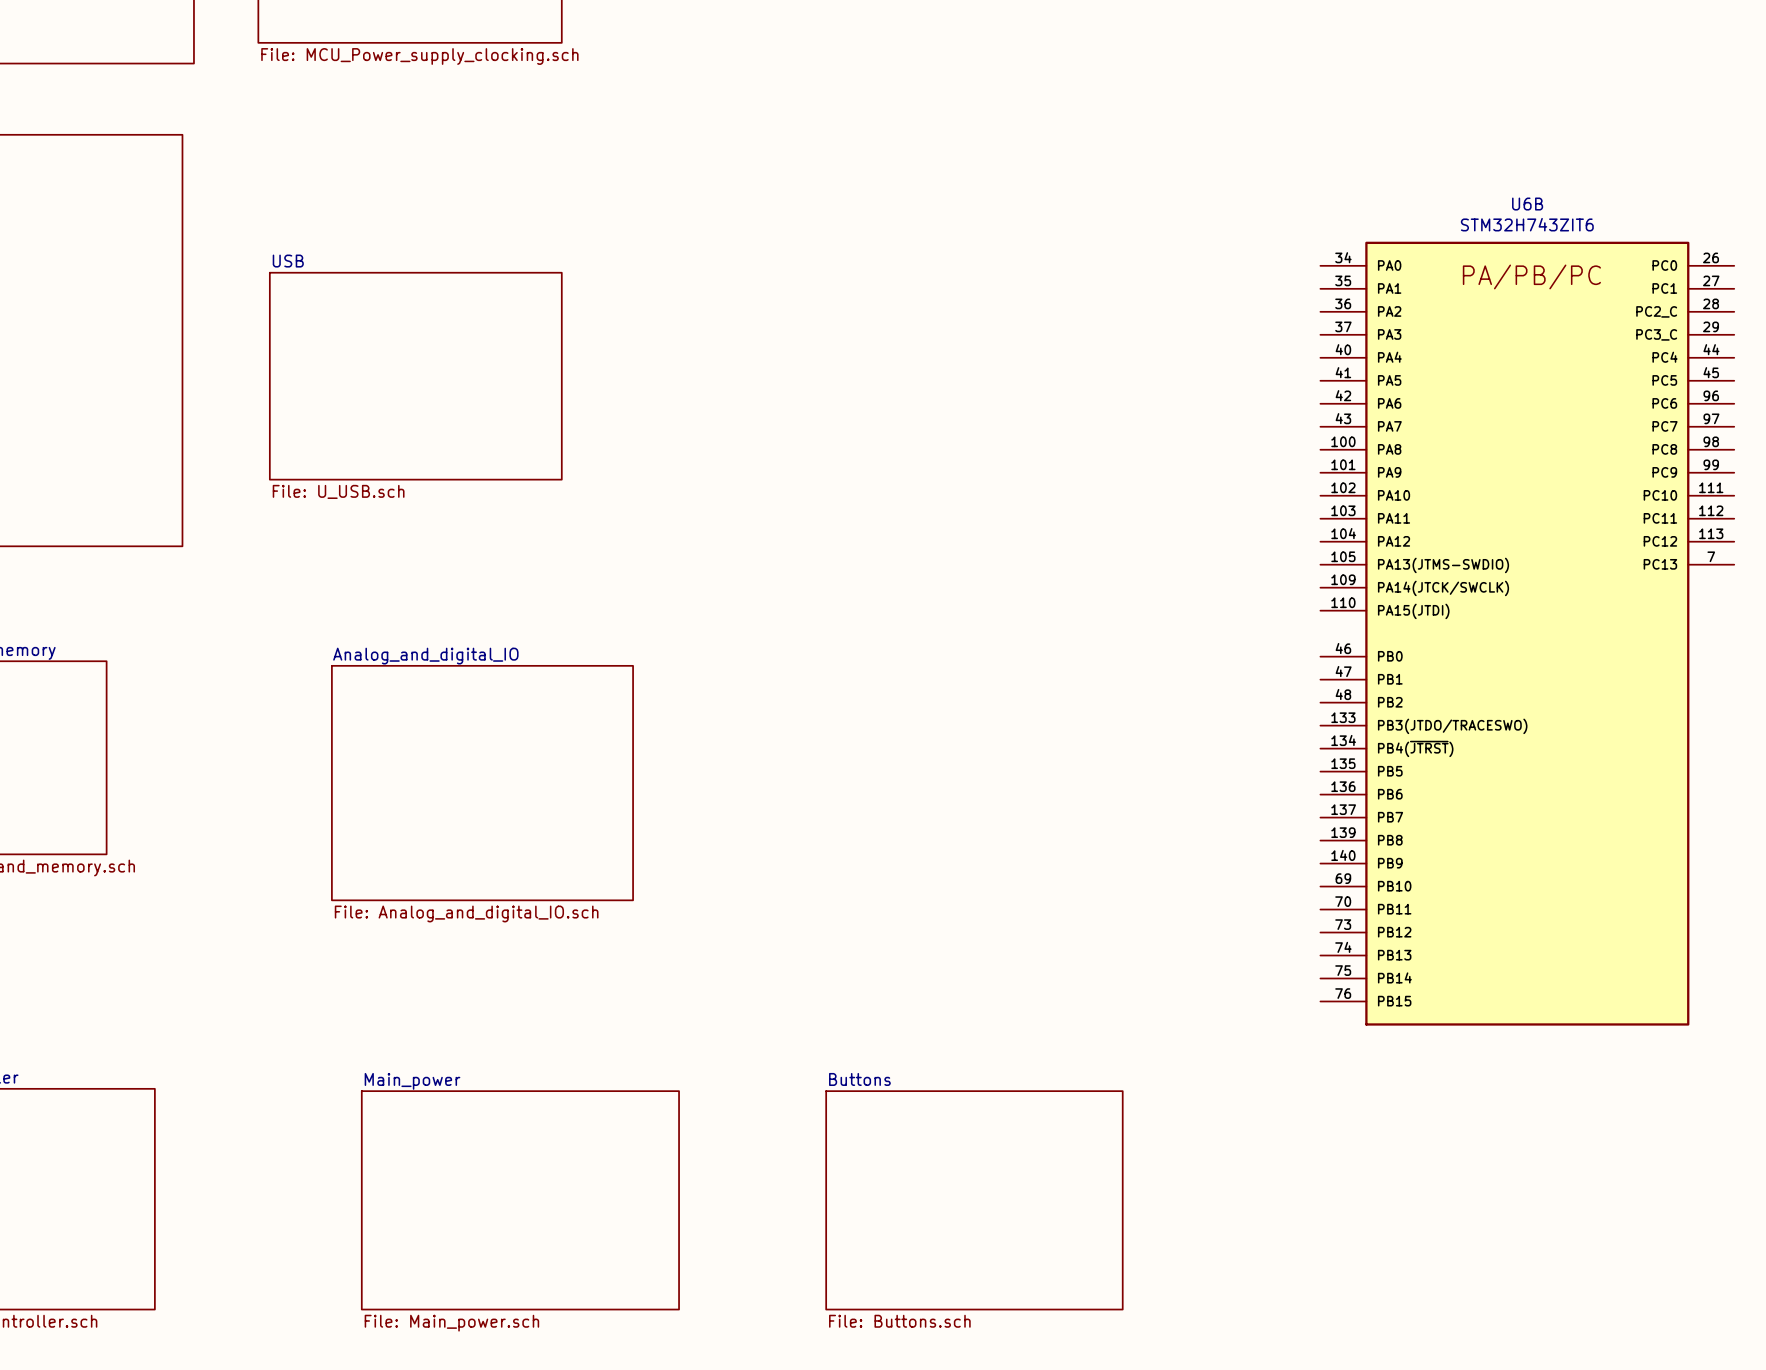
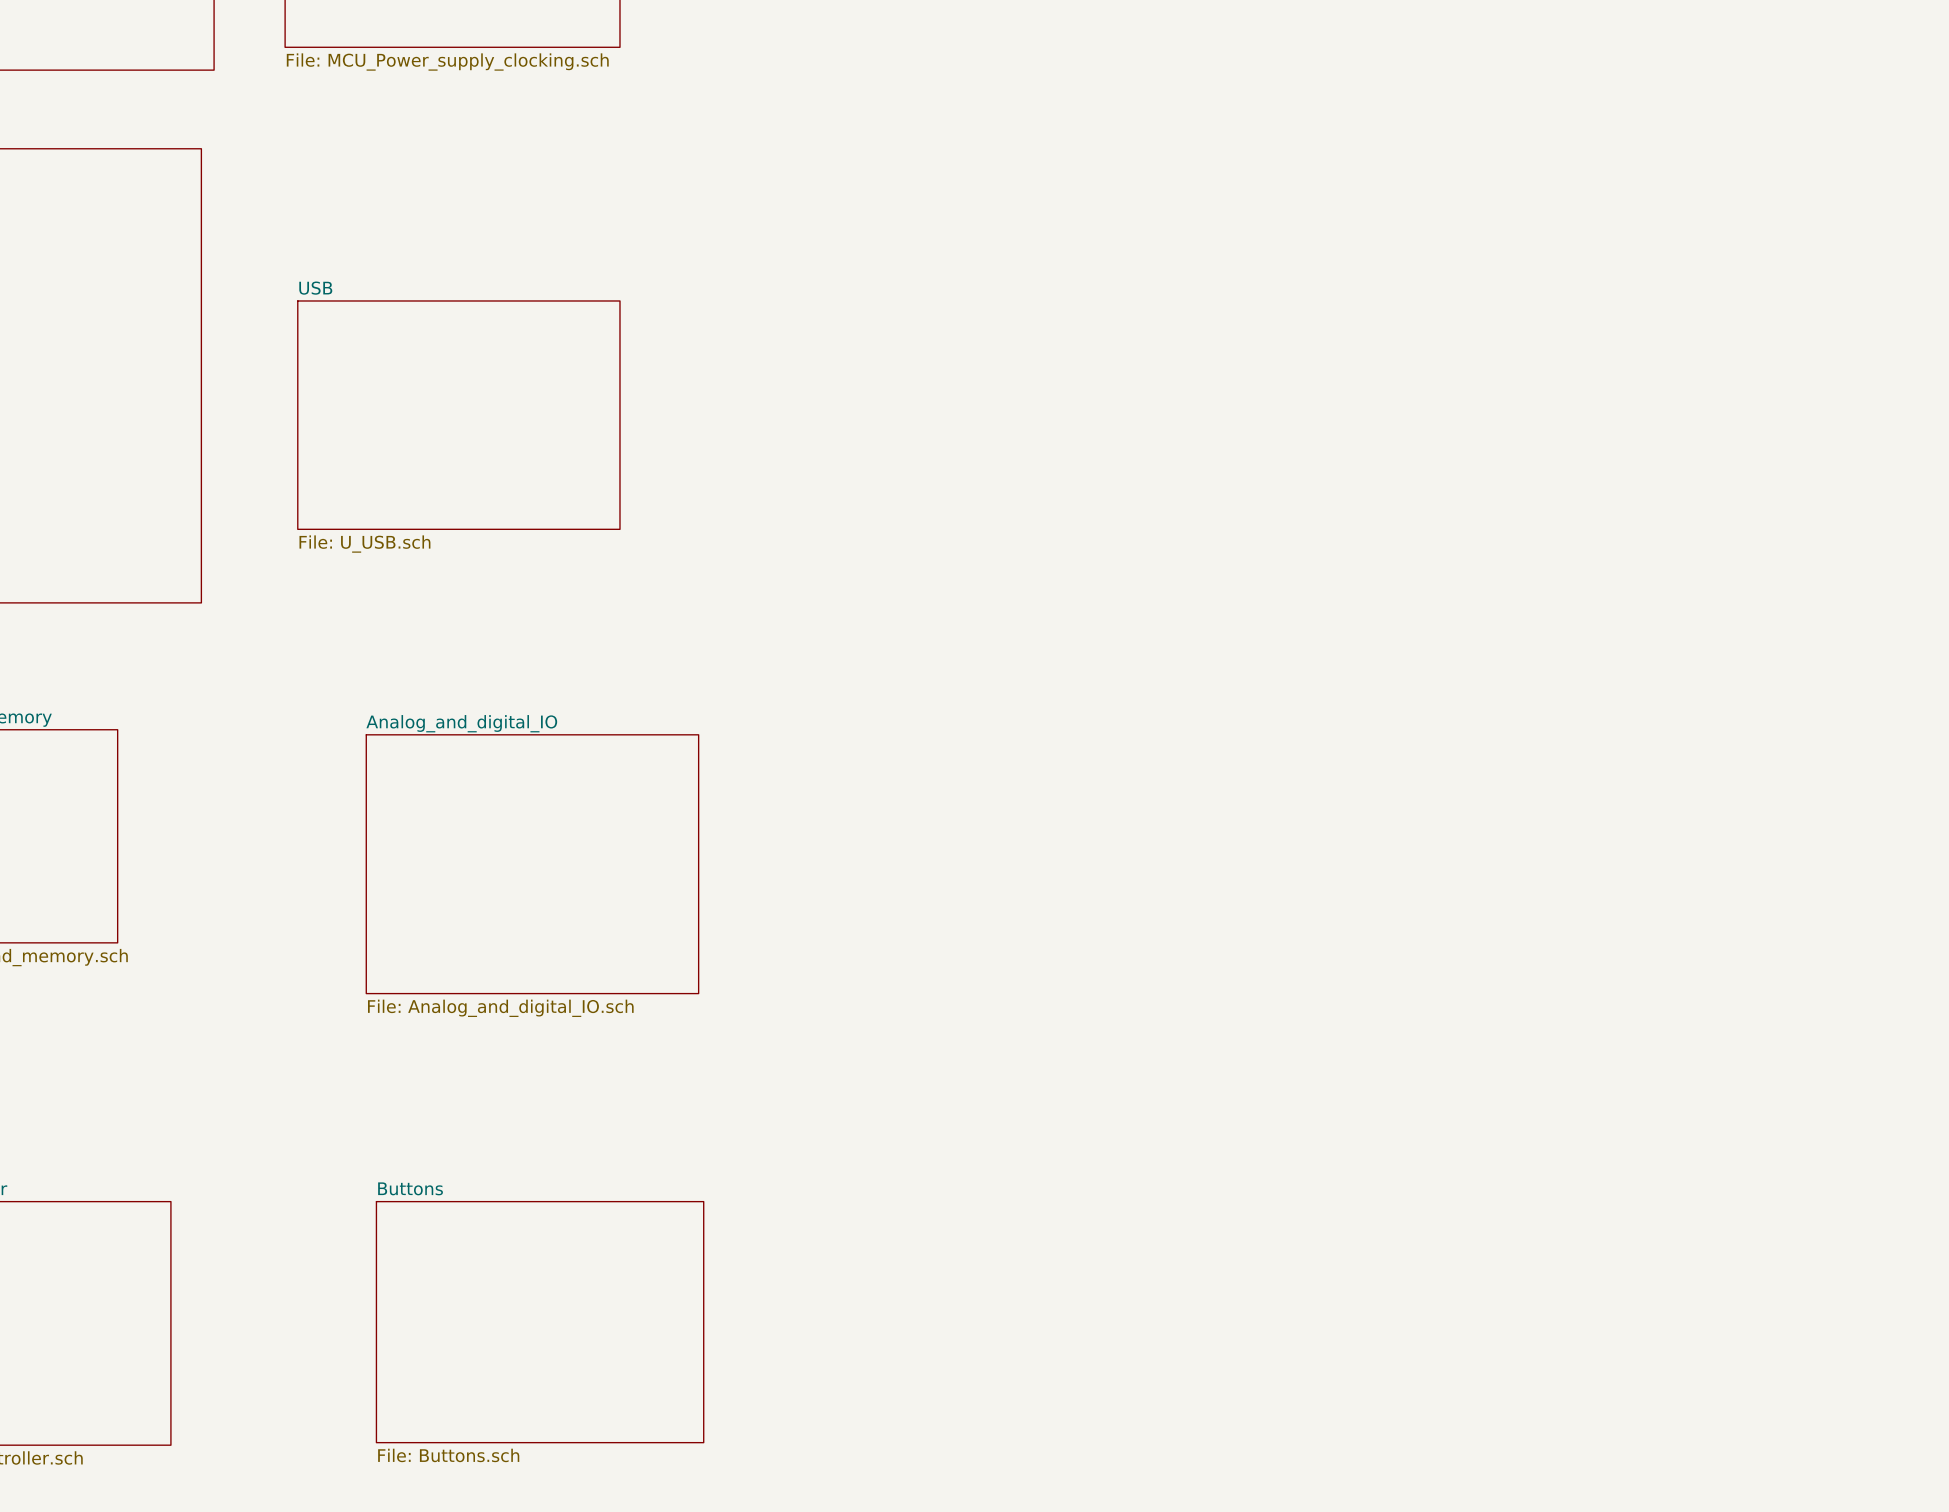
U6B: STM32H743ZIT6 (1527, 633) -> none
sheet Buttons: none -> File: Buttons.sch (540, 1322)
sheet Main_power: File: Main_power.sch (520, 1200) -> none
sheet Buttons: File: Buttons.sch (974, 1200) -> none

